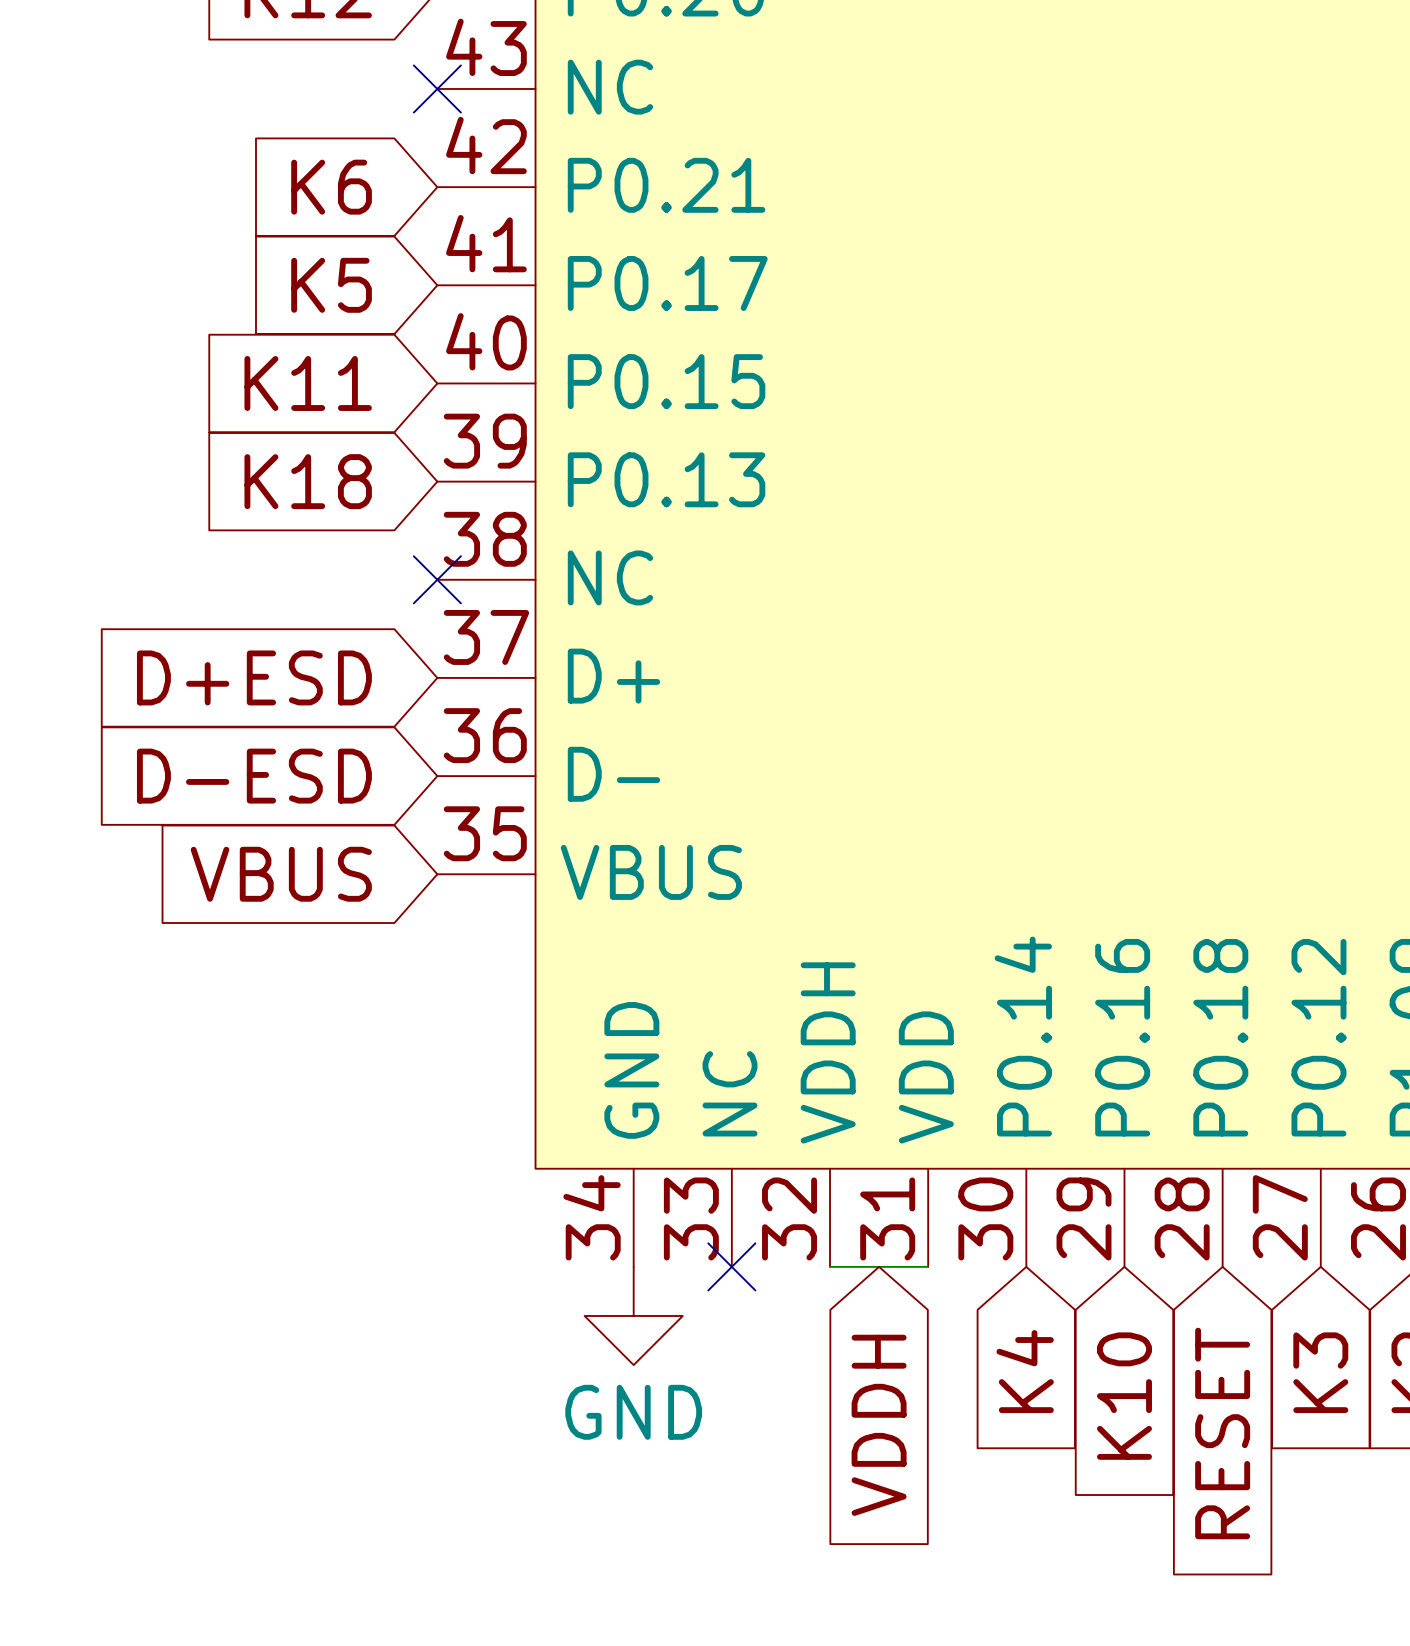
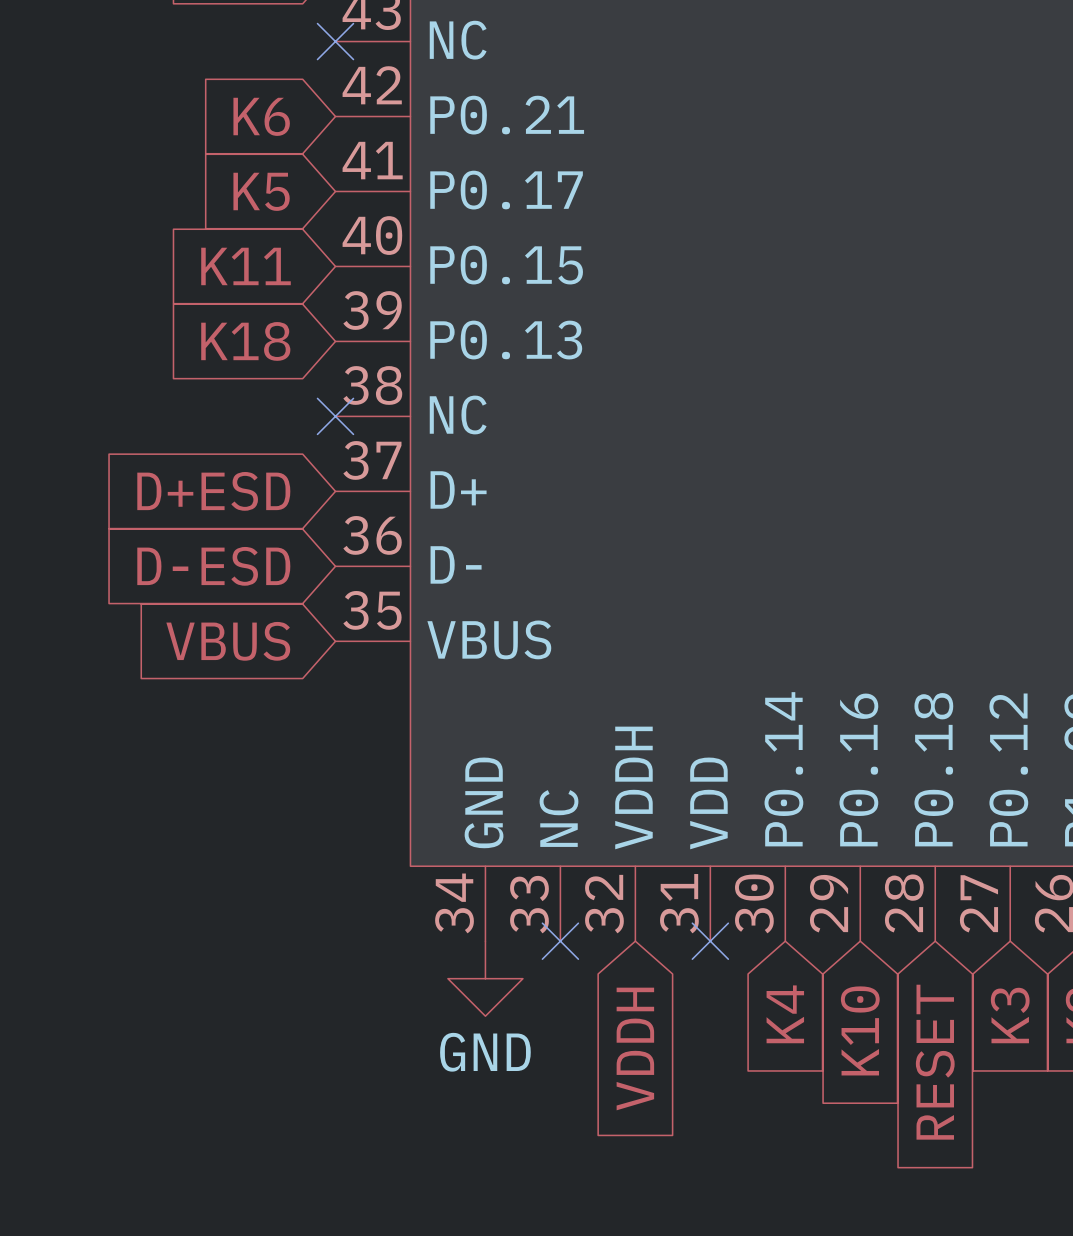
wire: (830, 1266) (928, 1266) -> none
no-connect mark: none -> (710, 941)
global label position: VDDH (879, 1425) -> VDDH (635, 1048)

